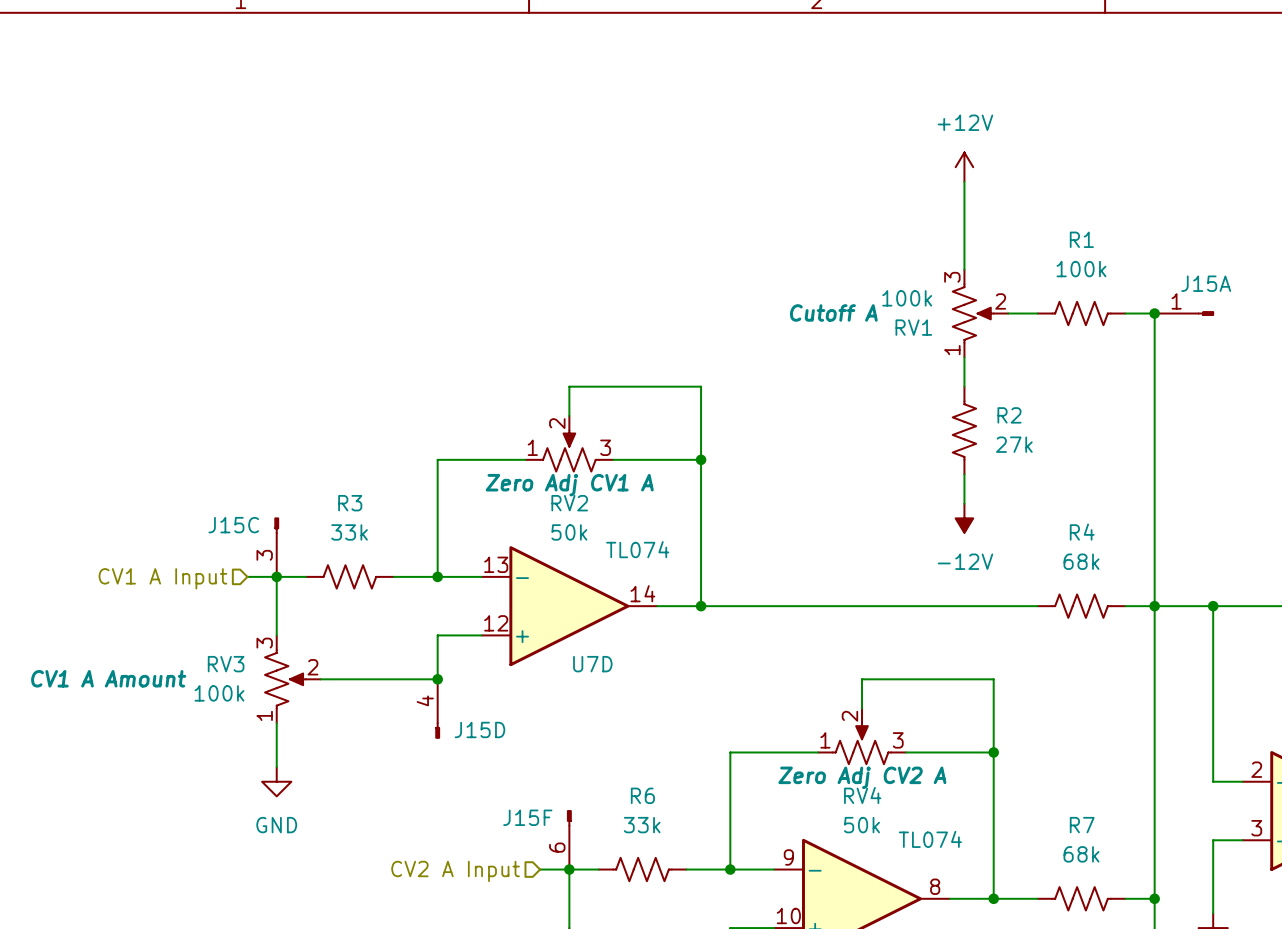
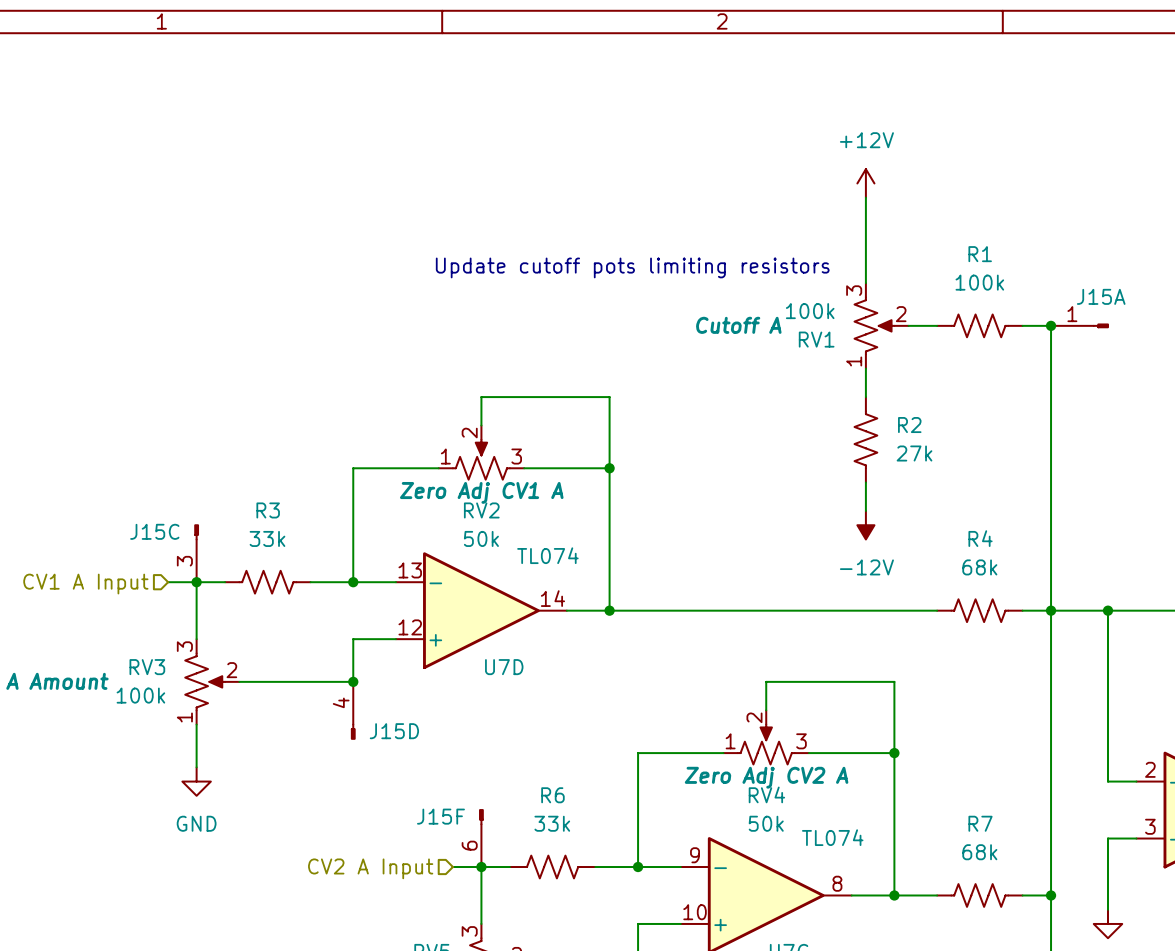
text: none -> Update cutoff pots limiting resistors (632, 267)

